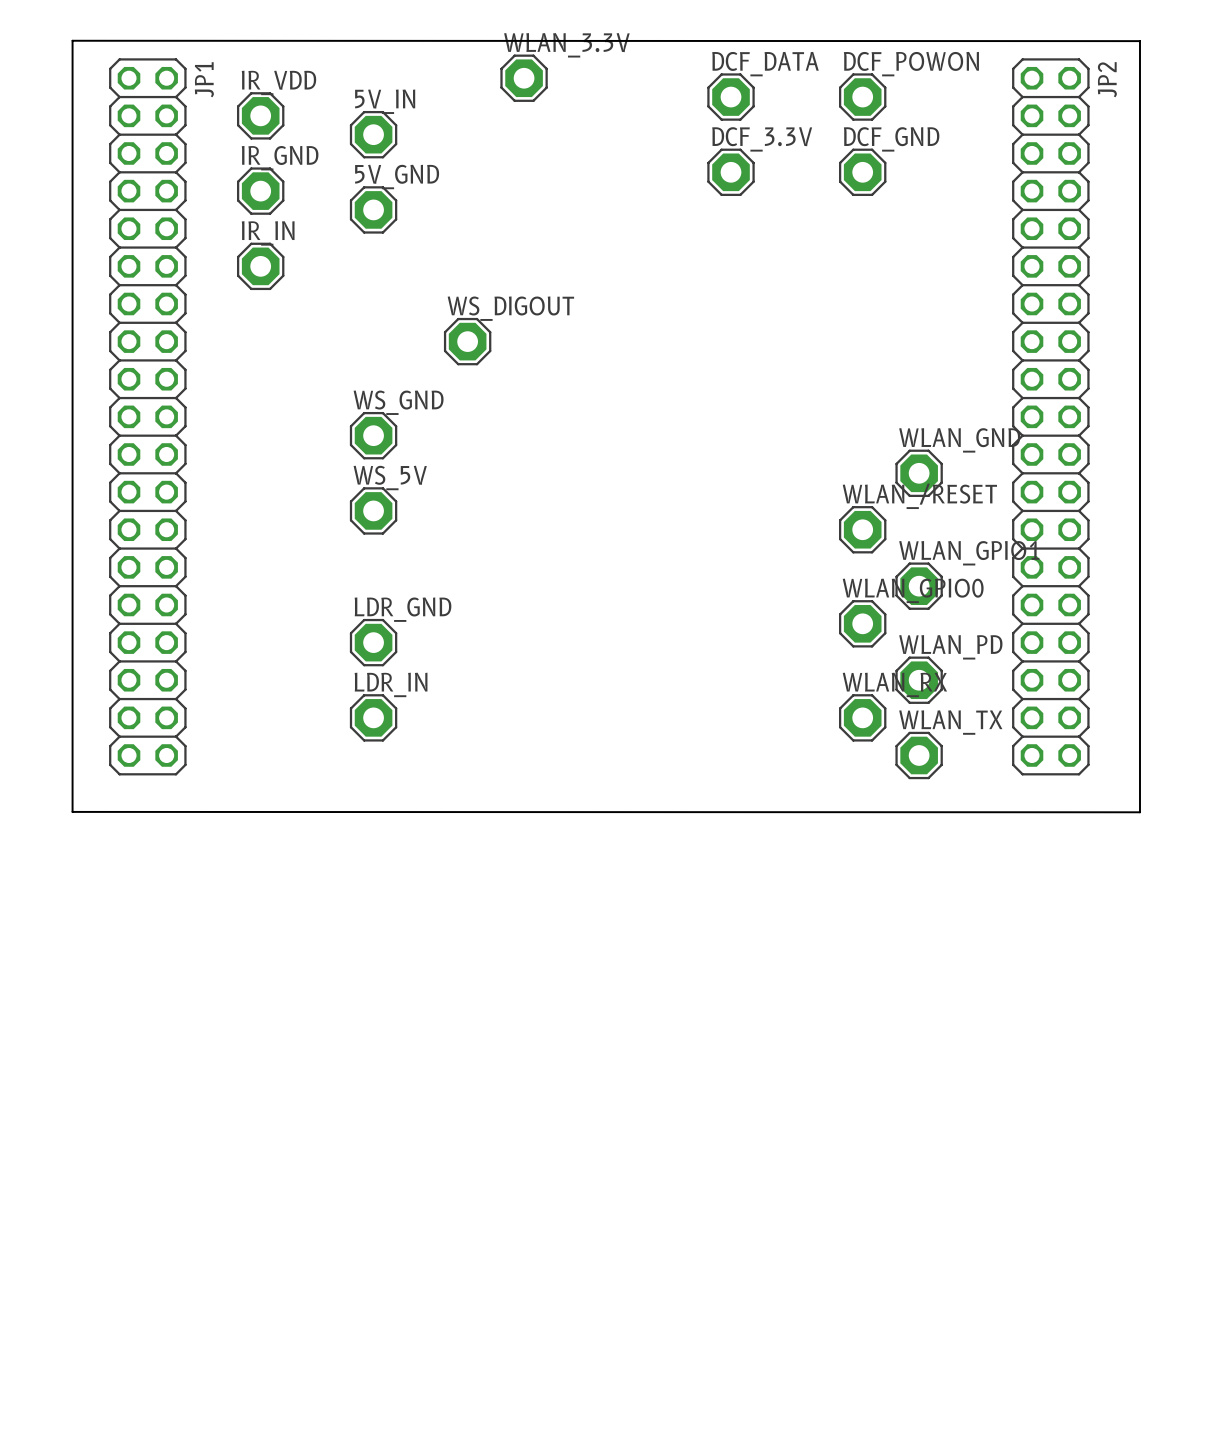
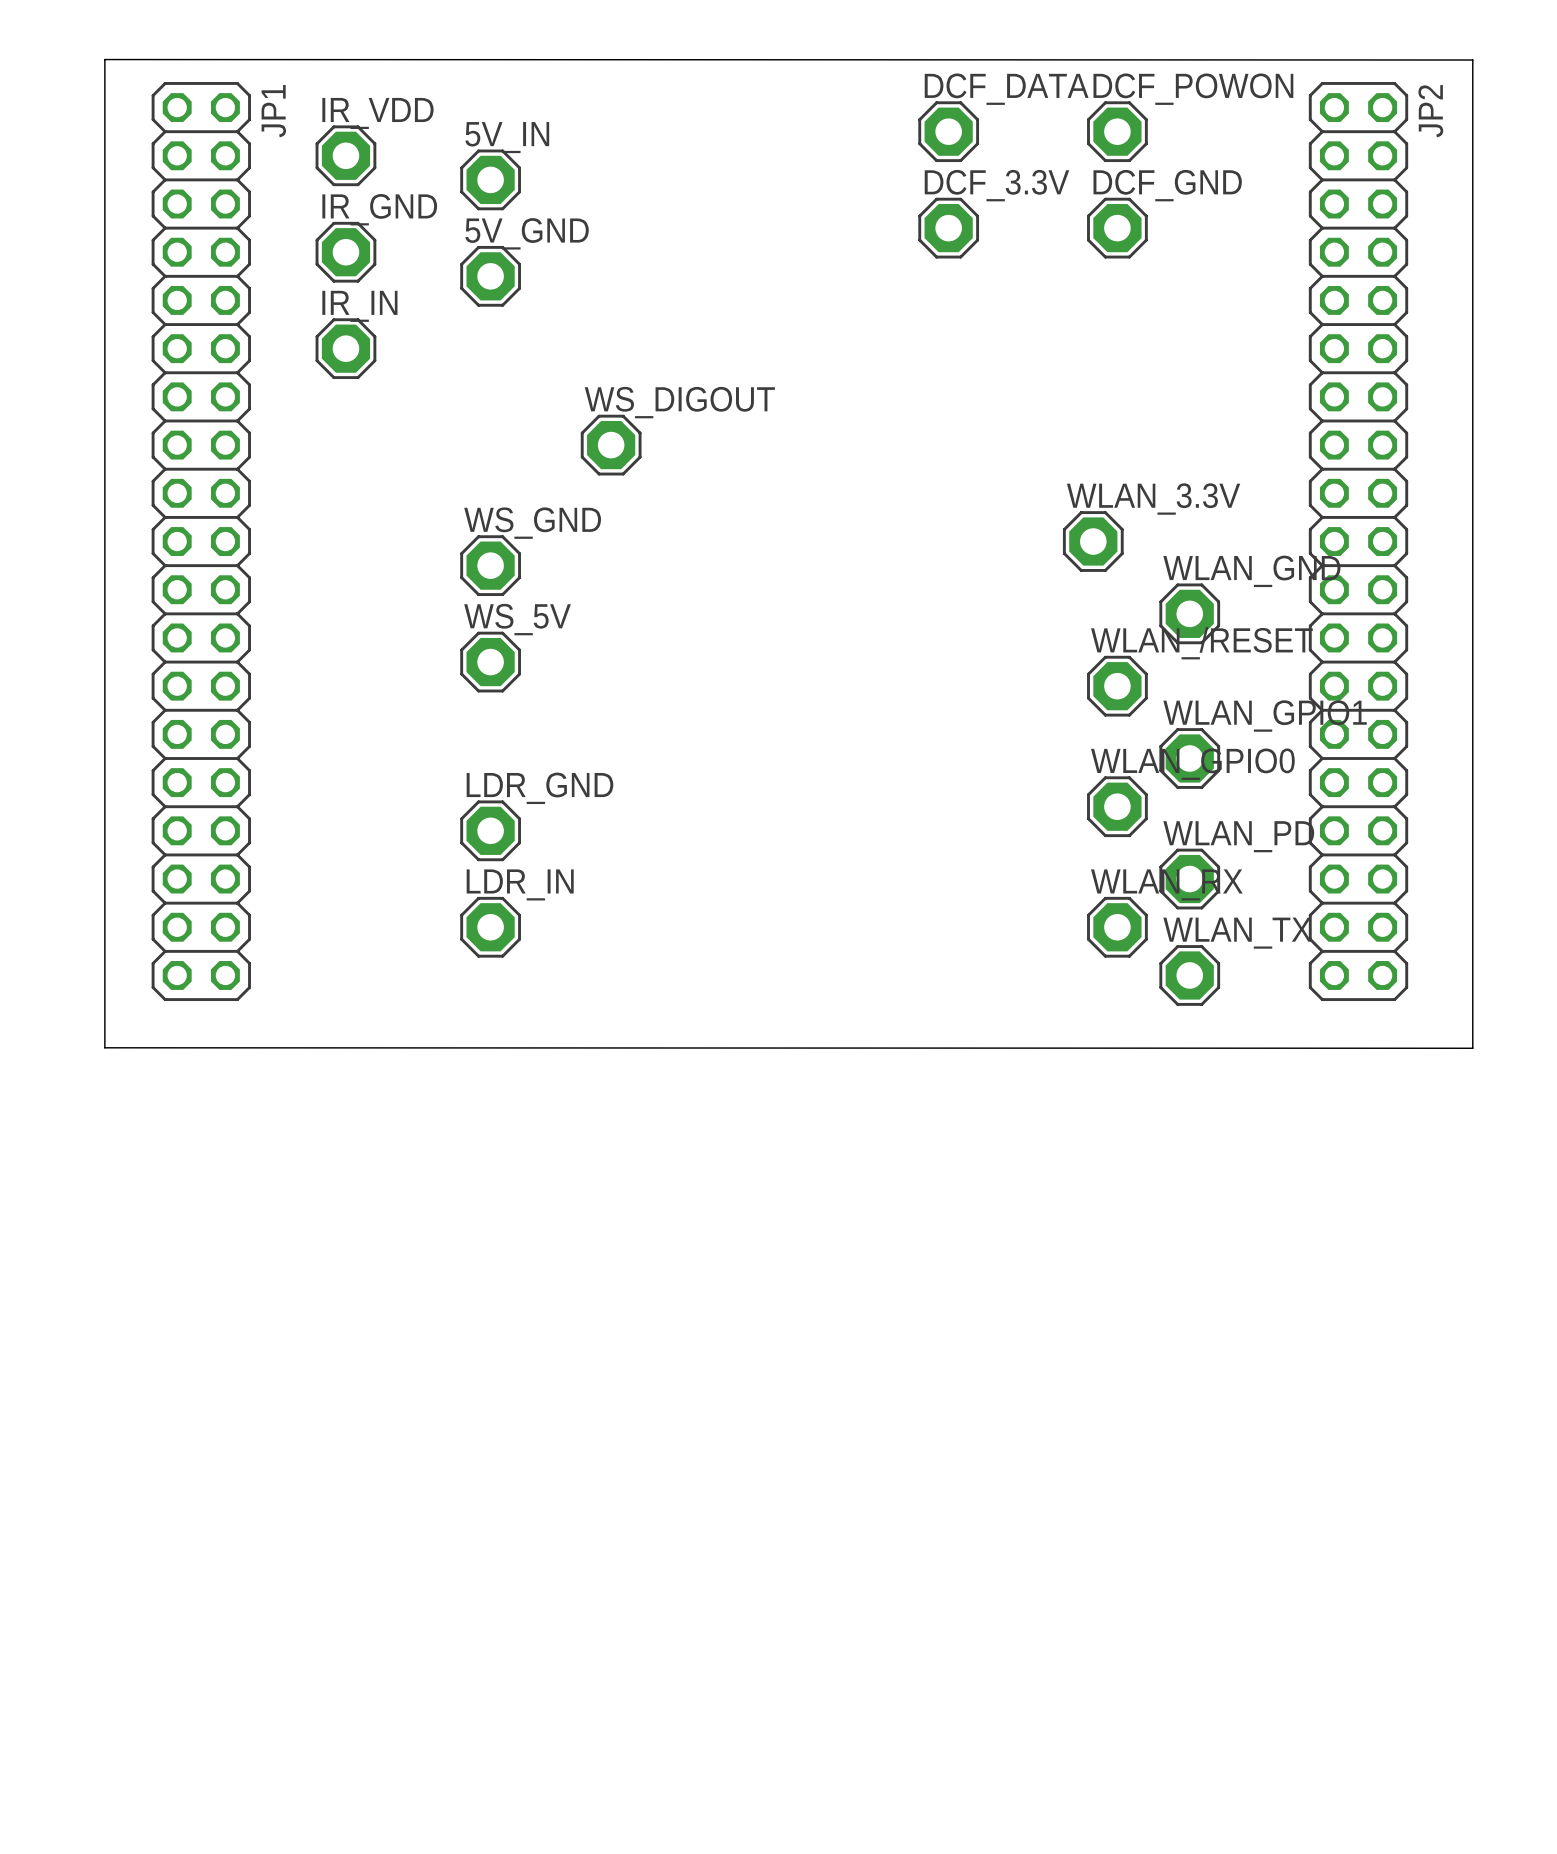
WLAN_3.3V position: (524, 78) -> (1093, 541)

